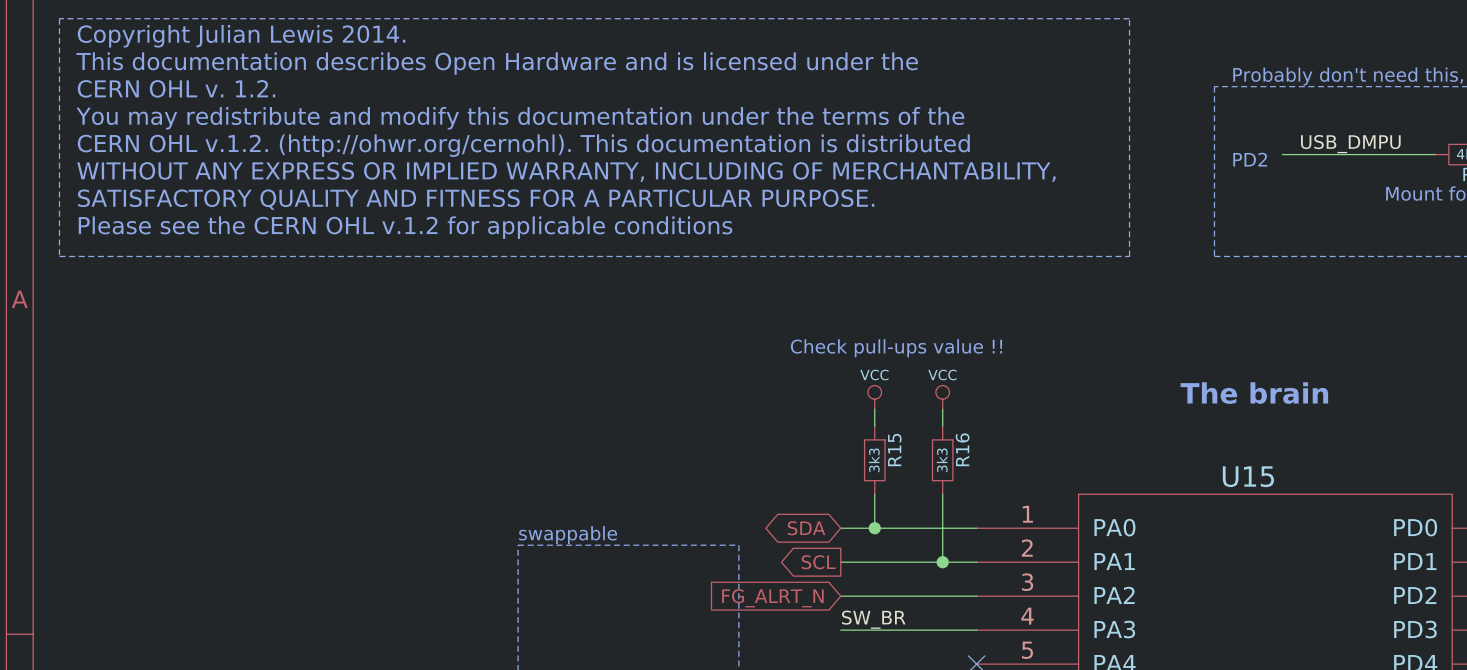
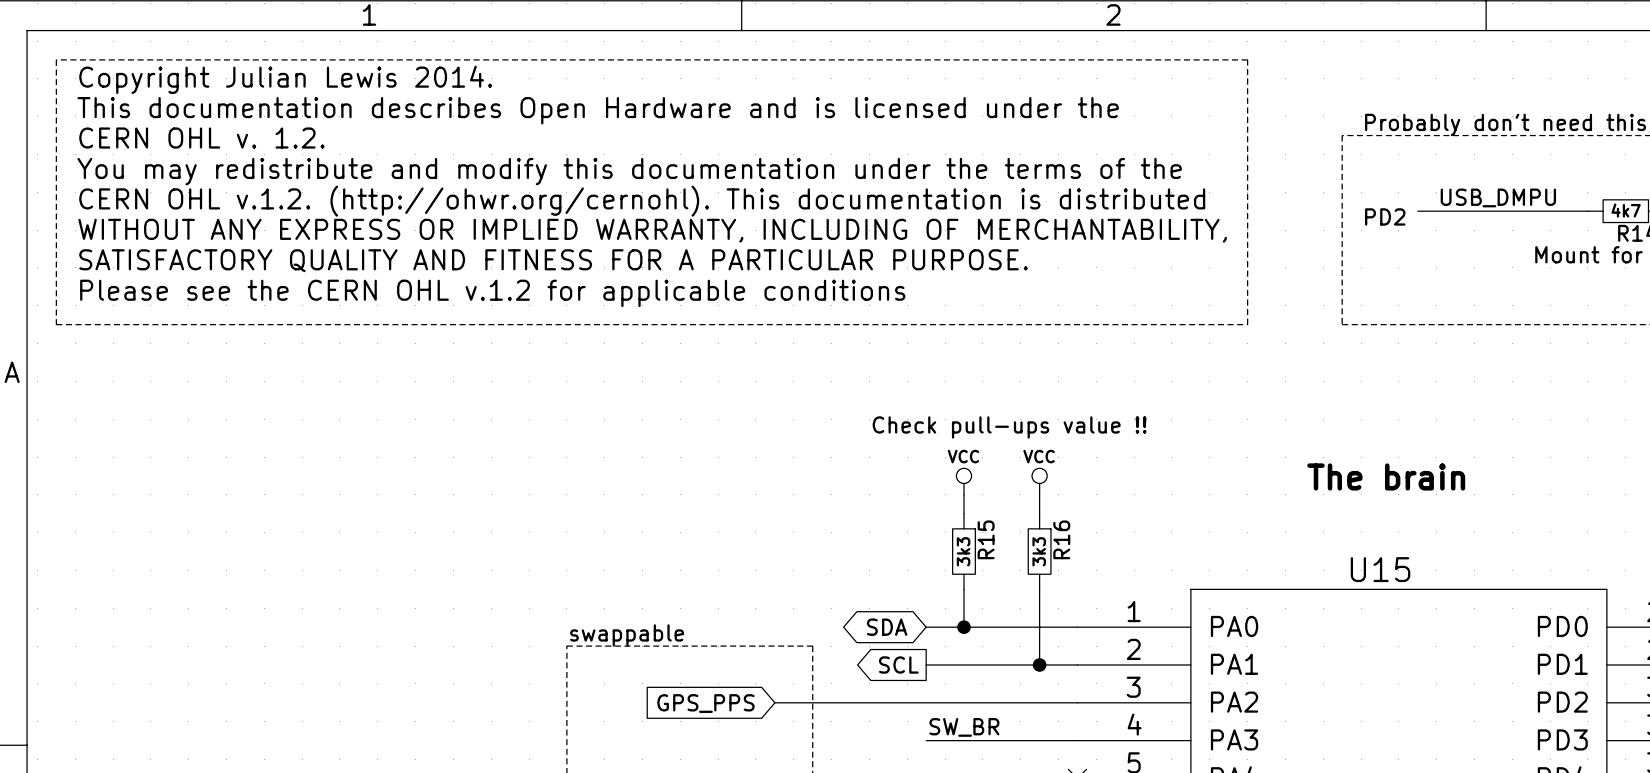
wire: none -> (774, 702) (926, 702)
global label: none -> GPS_PPS (705, 703)
global label: FG_ALRT_N (772, 598) -> none

